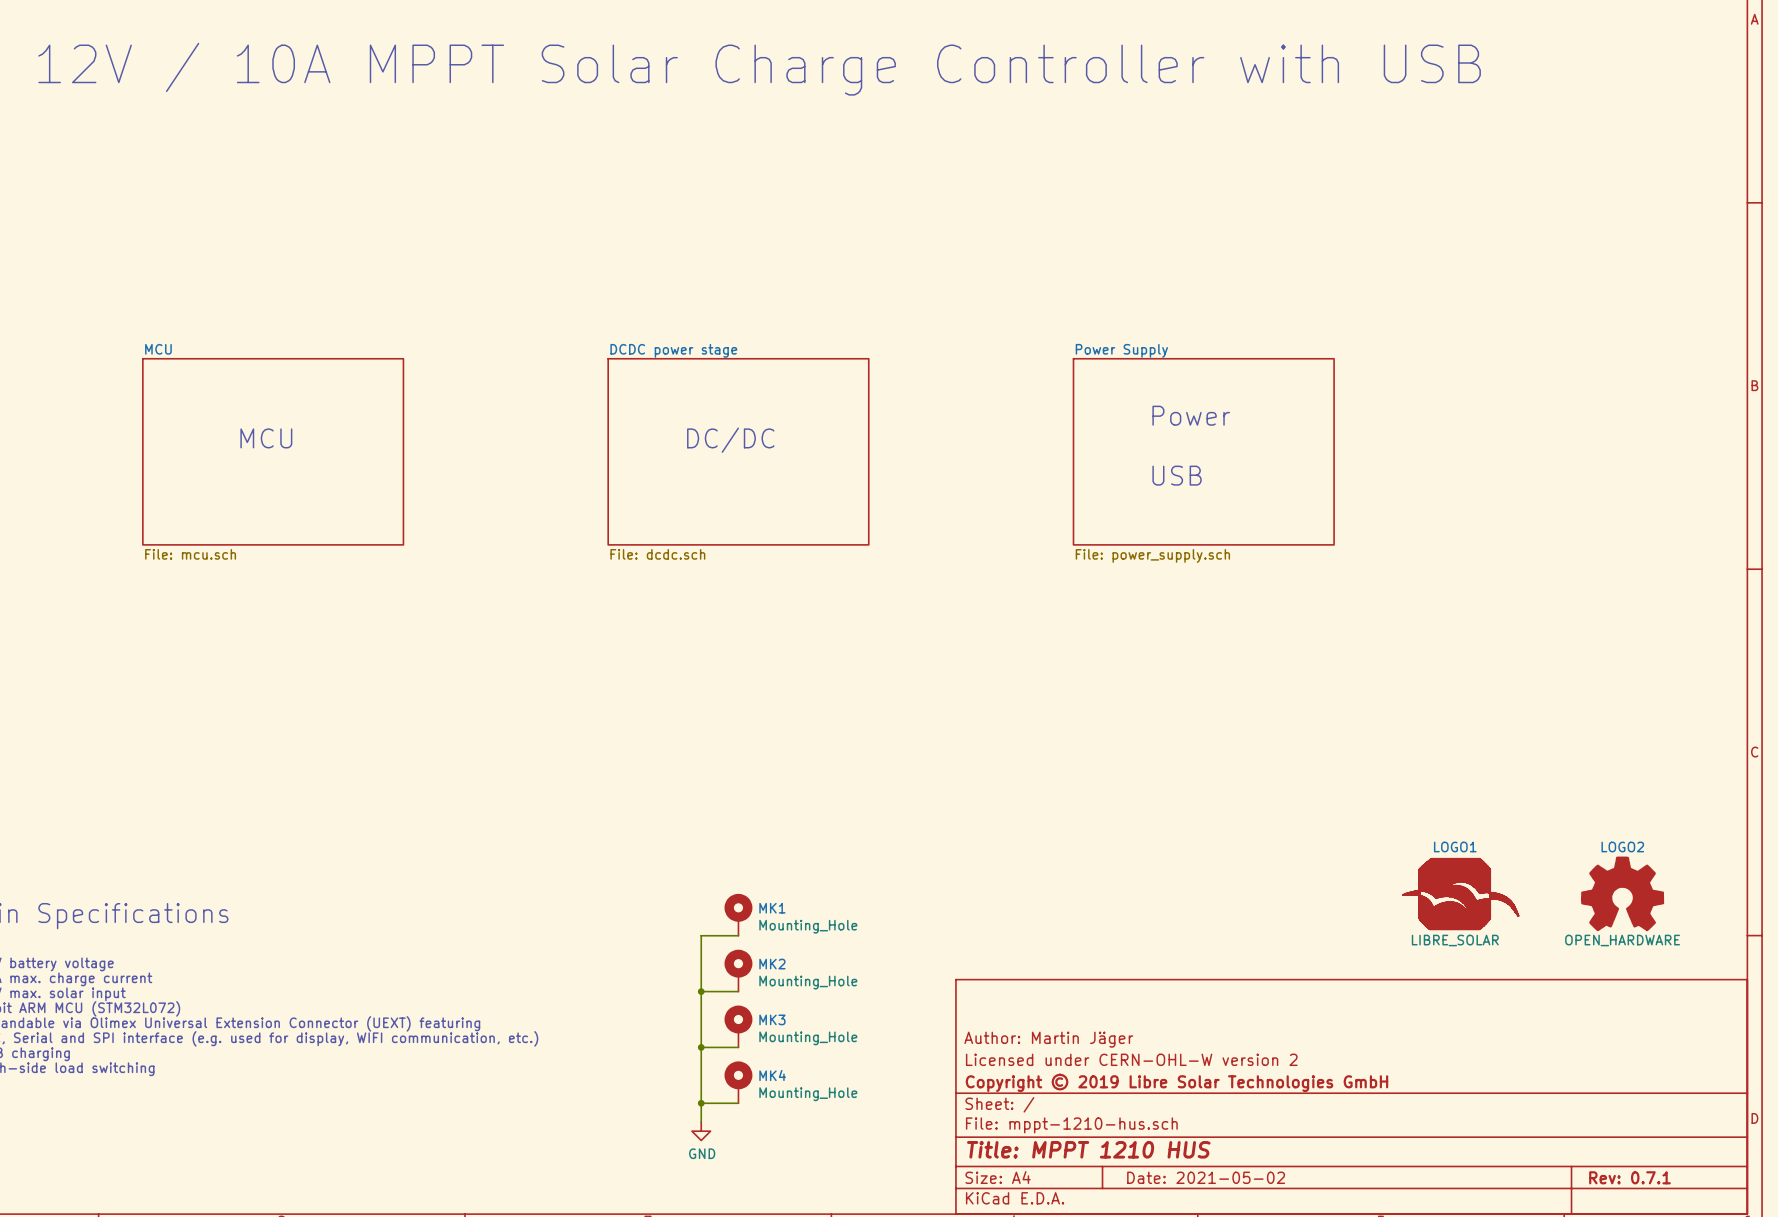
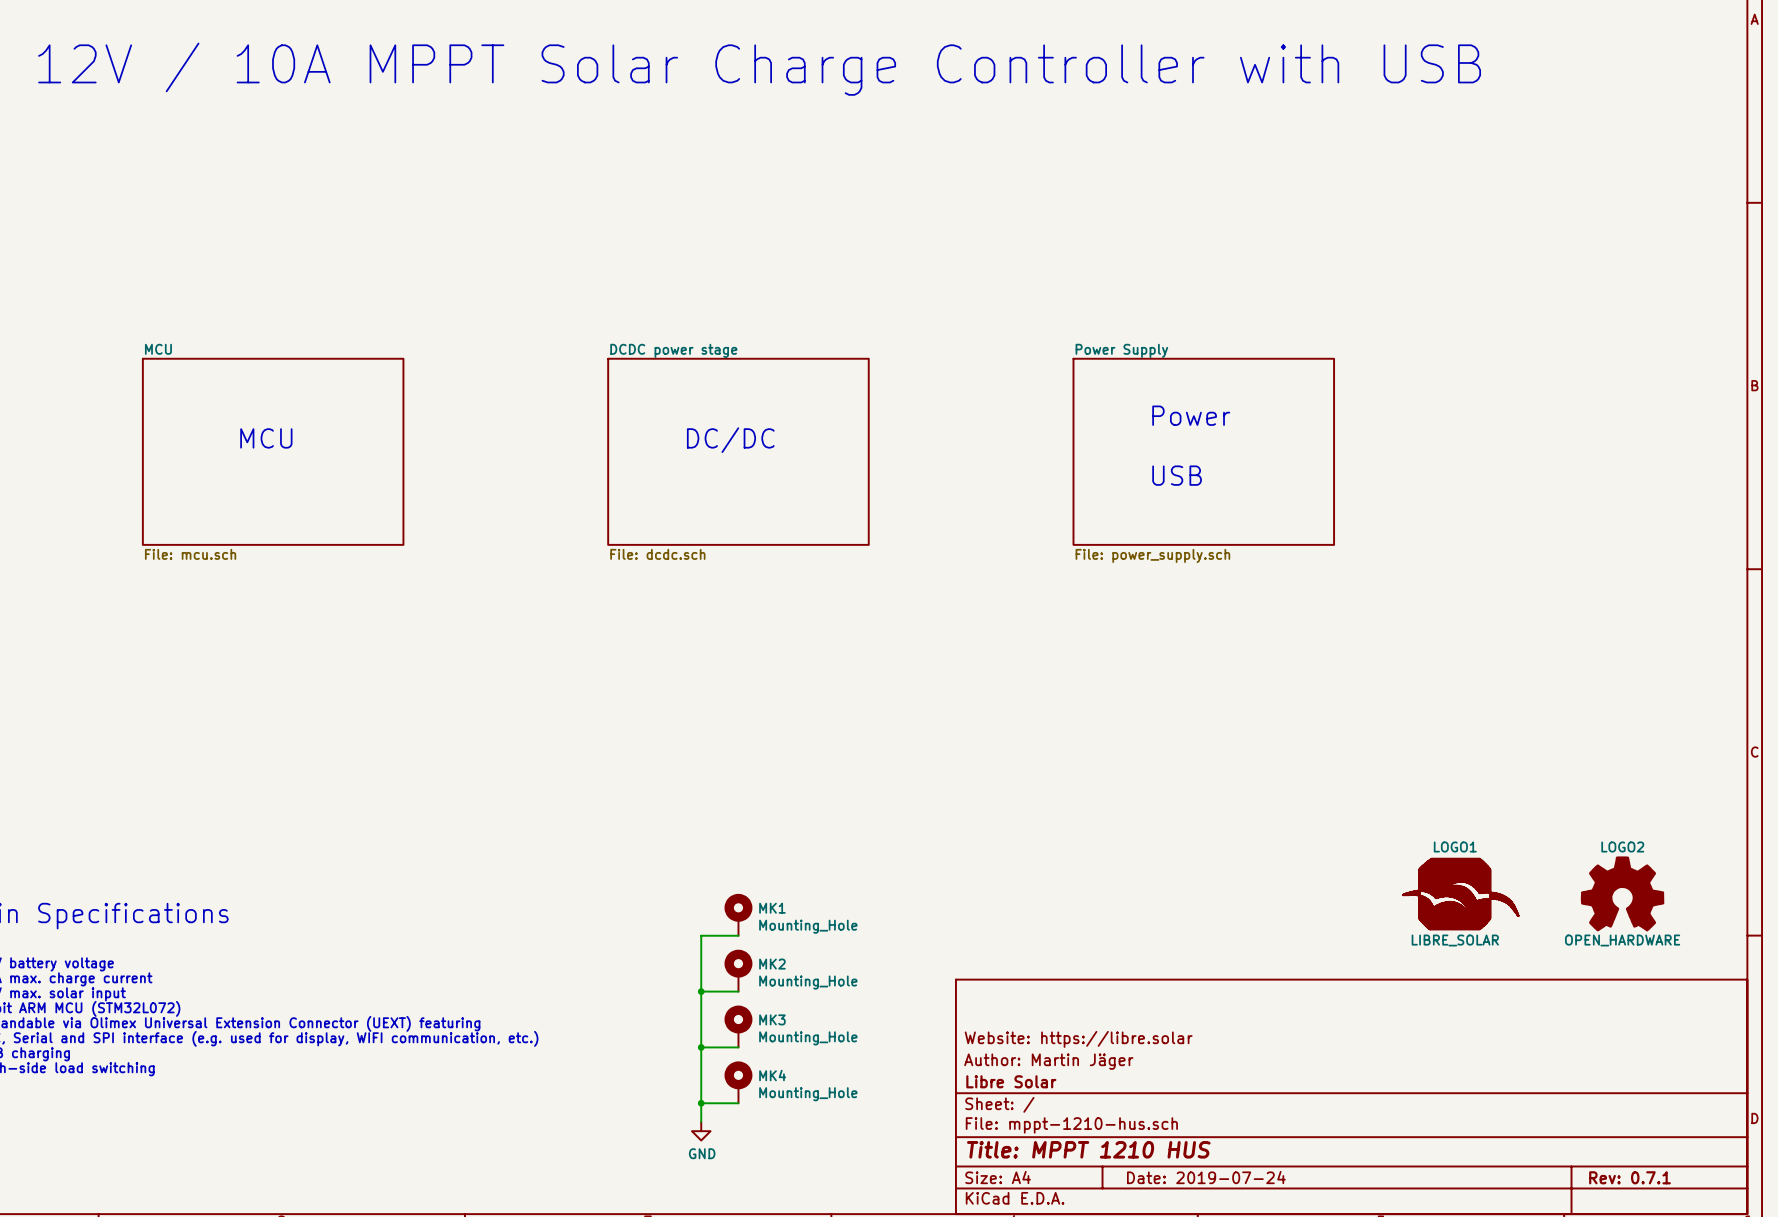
title block: Author: Martin Jäger (1048, 1039) -> Website: https://libre.solar (1078, 1039)
title block: Licensed under CERN-OHL-W version 2 (1131, 1059) -> Author: Martin Jäger (1048, 1061)
title block: Copyright © 2019 Libre Solar Technologies GmbH (1176, 1082) -> Libre Solar (1011, 1081)
title block: Date: 2021-05-02 (1206, 1177) -> Date: 2019-07-24 (1206, 1177)

